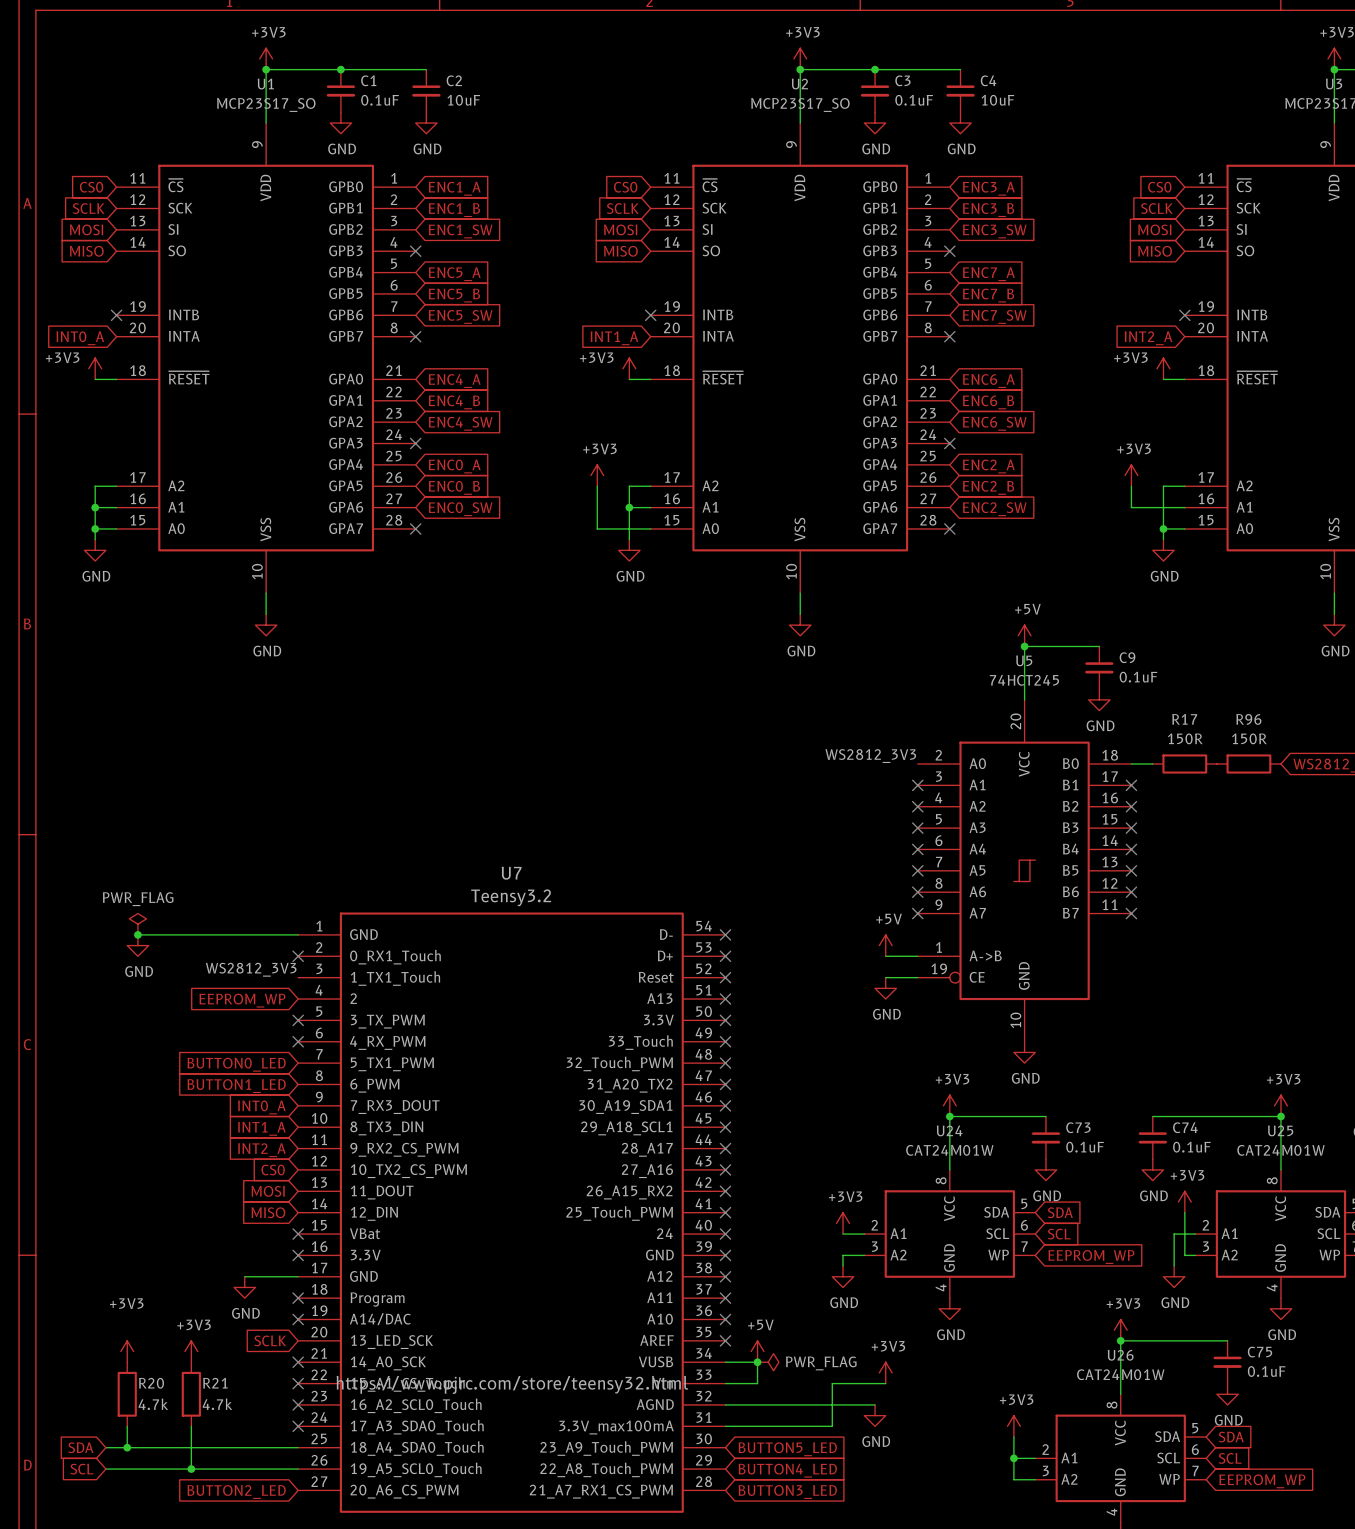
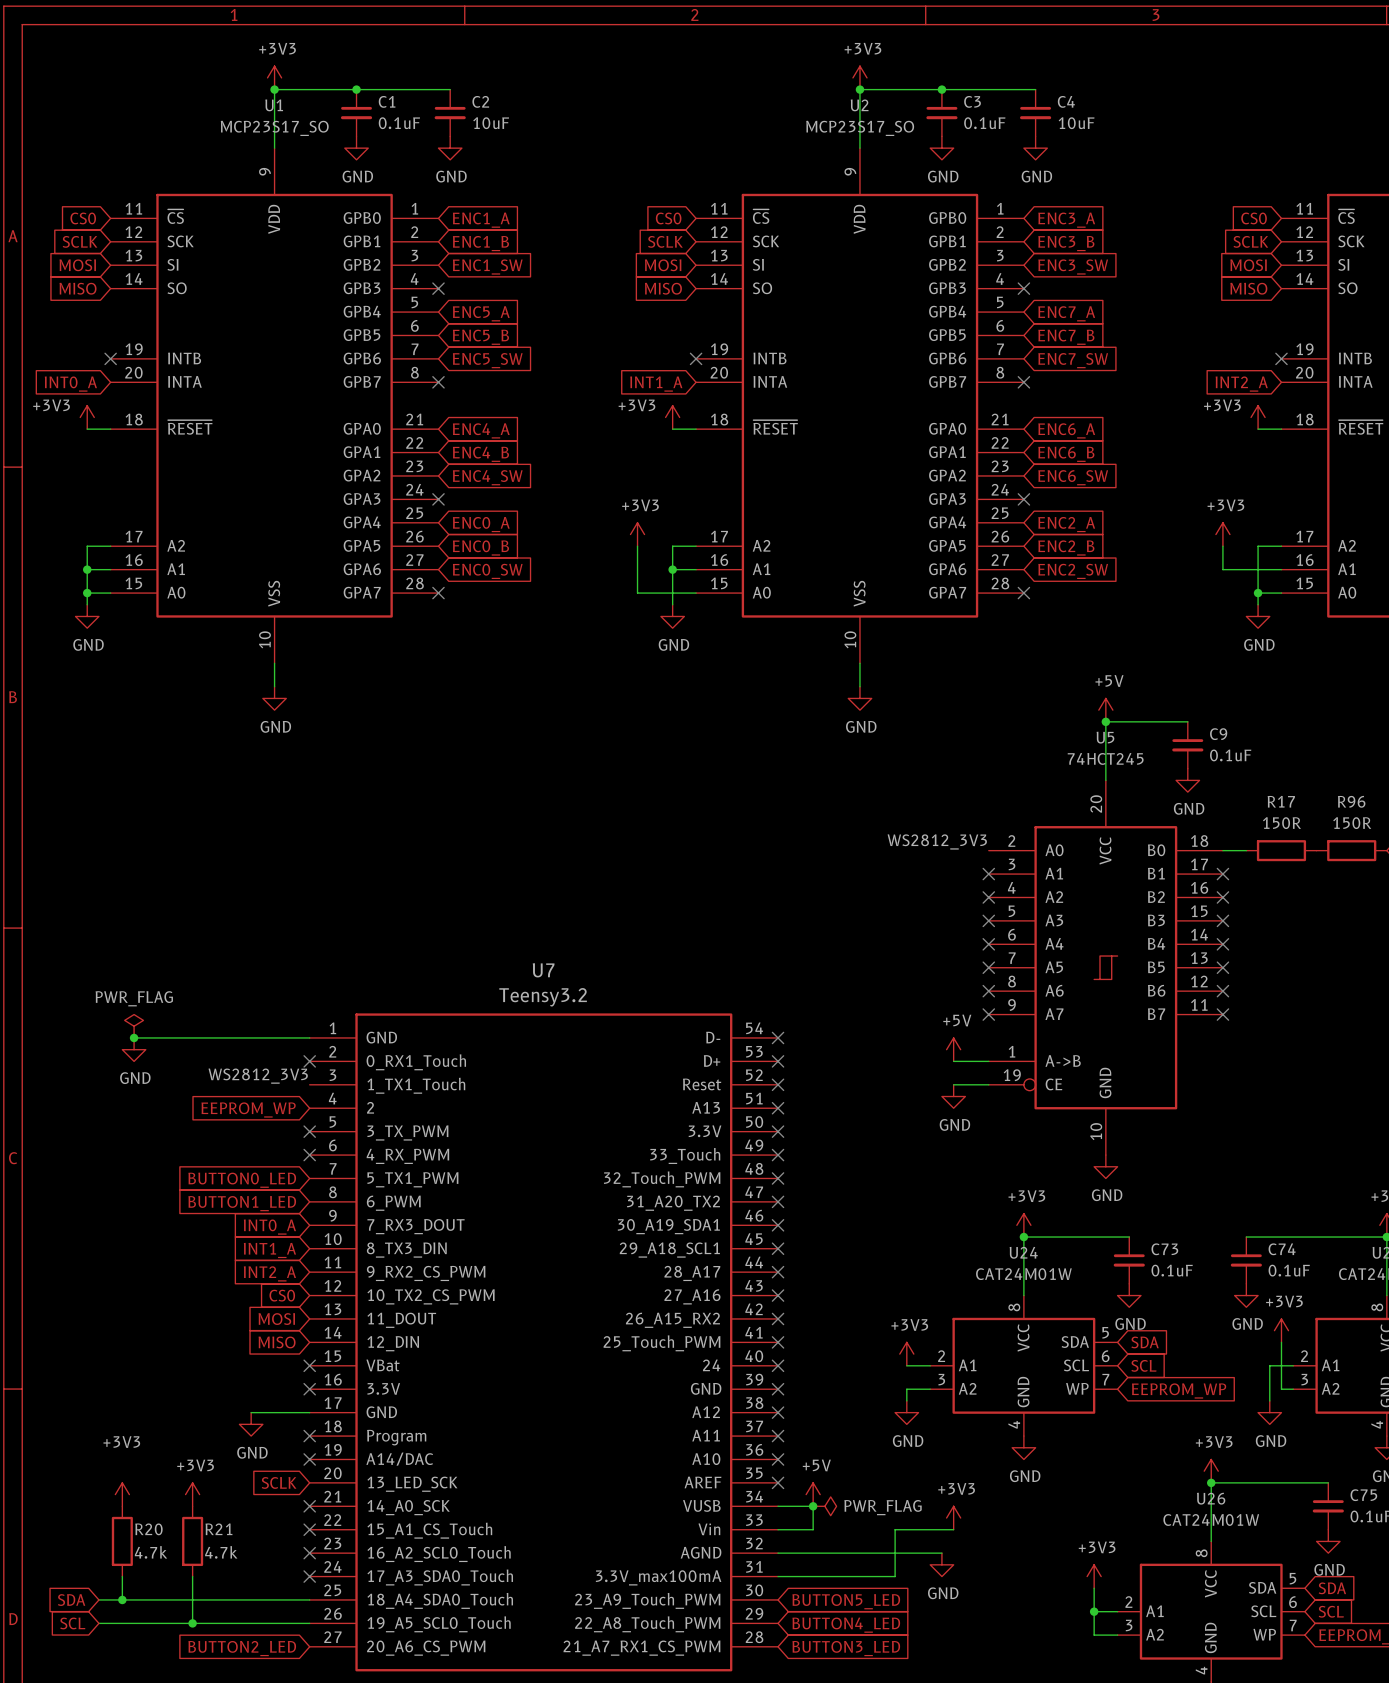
U7 text: https://www.pjrc.com/store/teensy32.html (512, 1384) -> none

